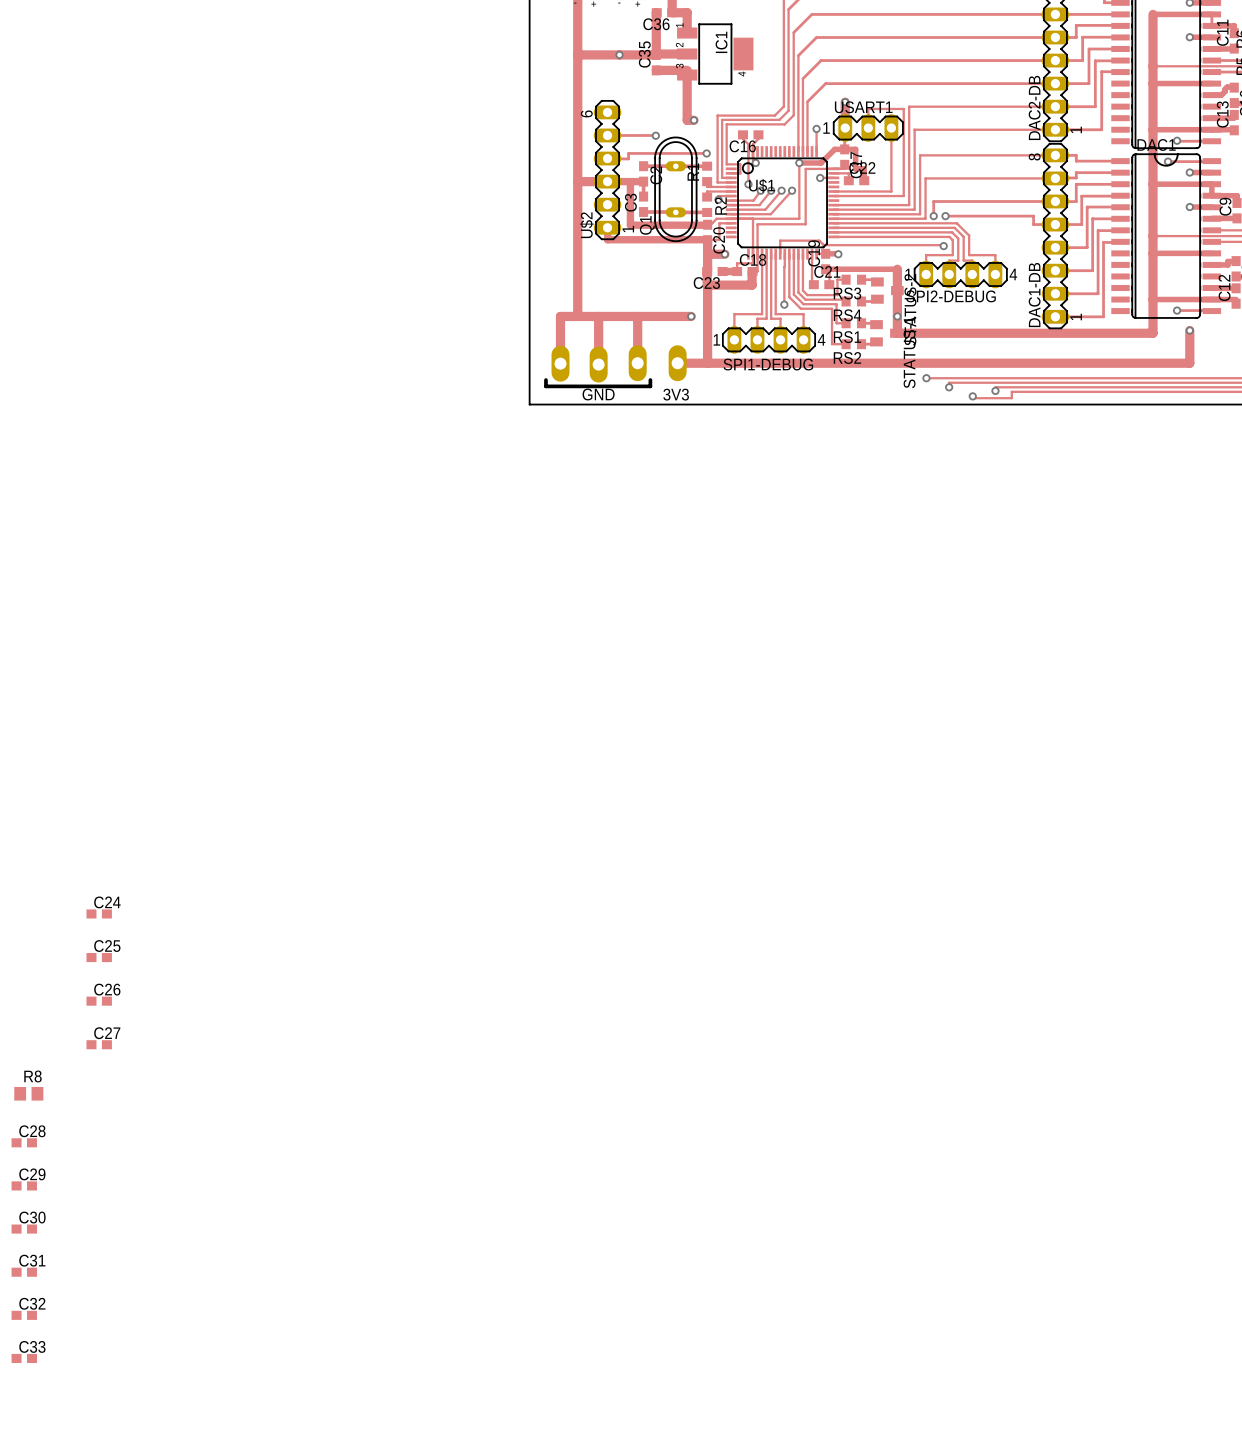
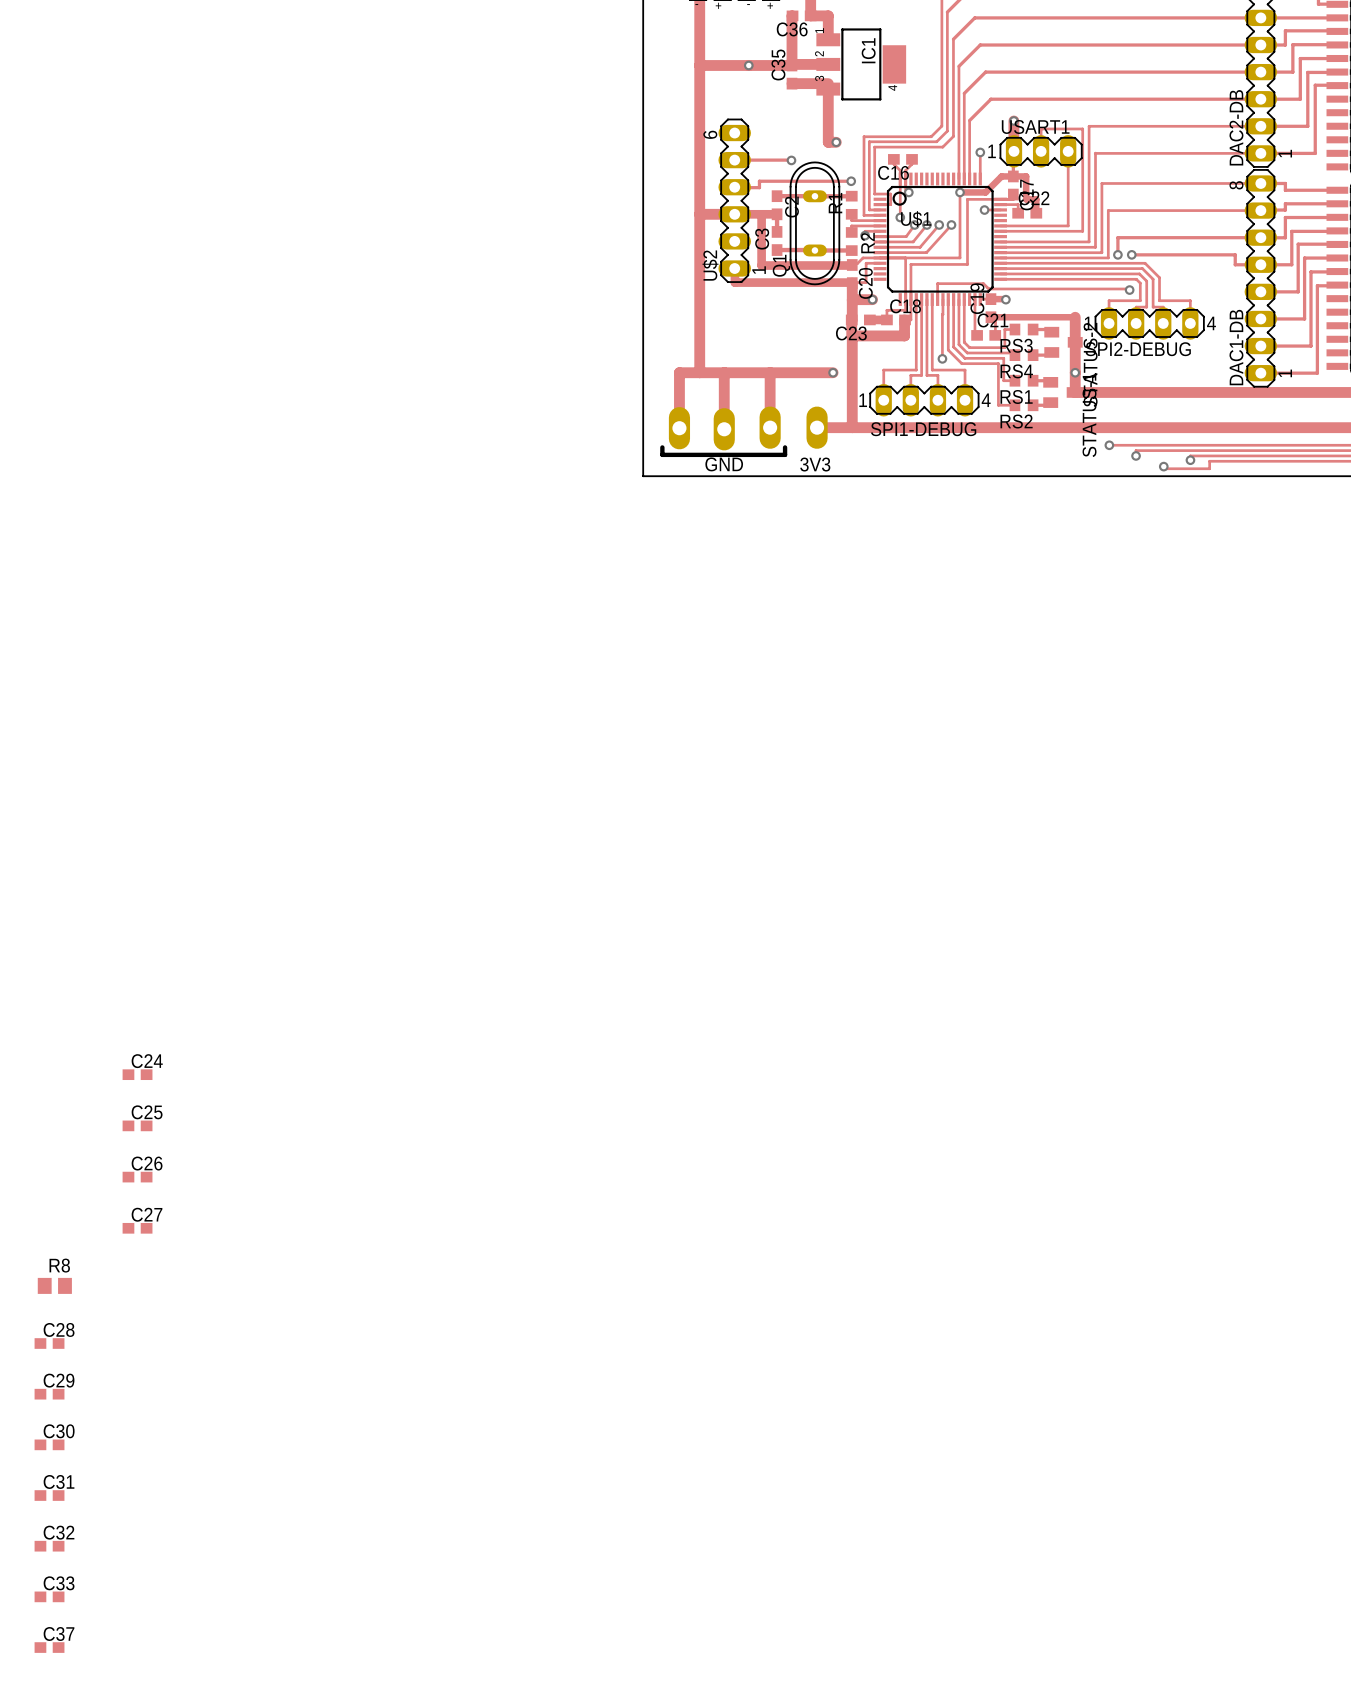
C37: none -> (49, 1647)

